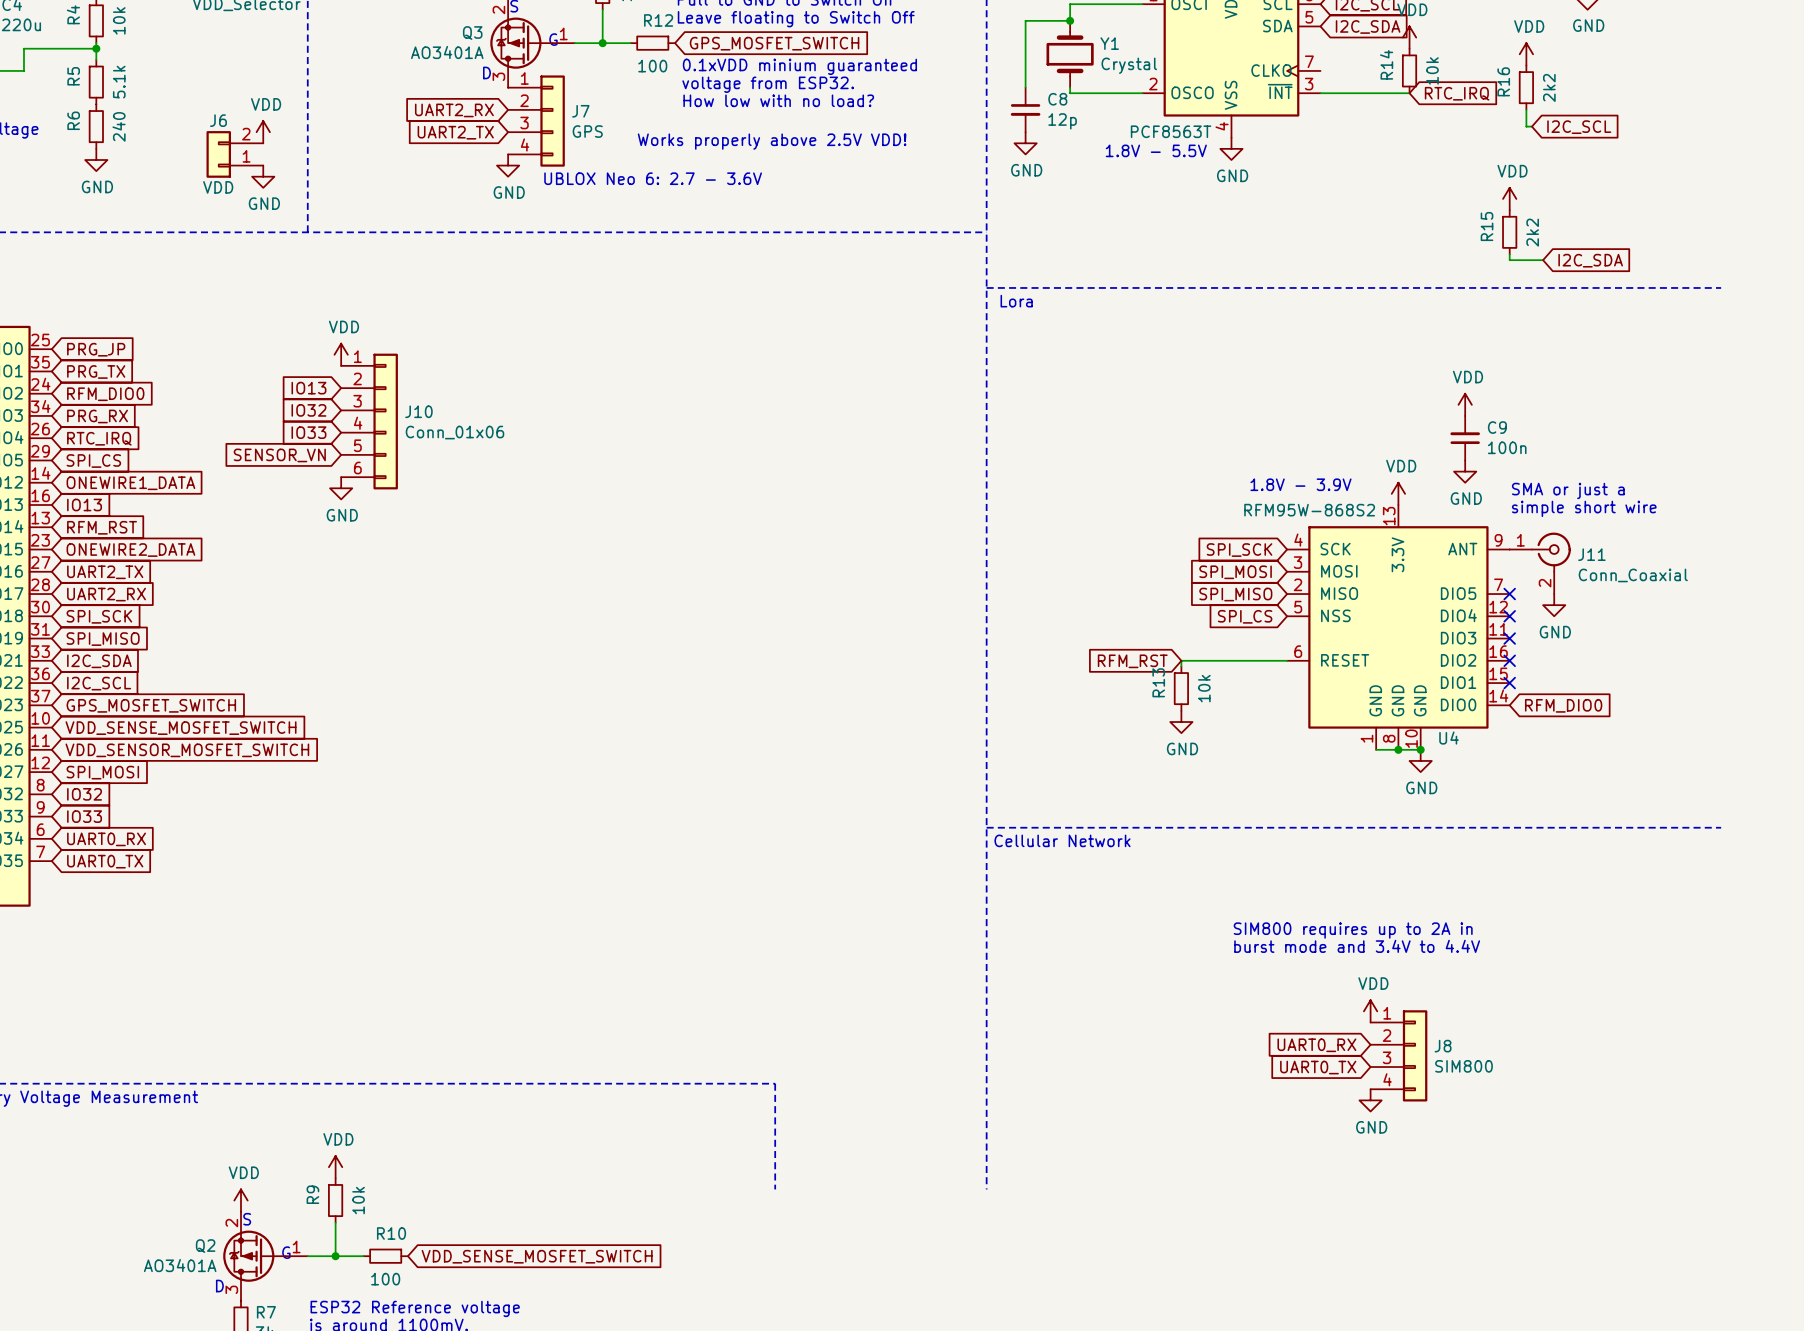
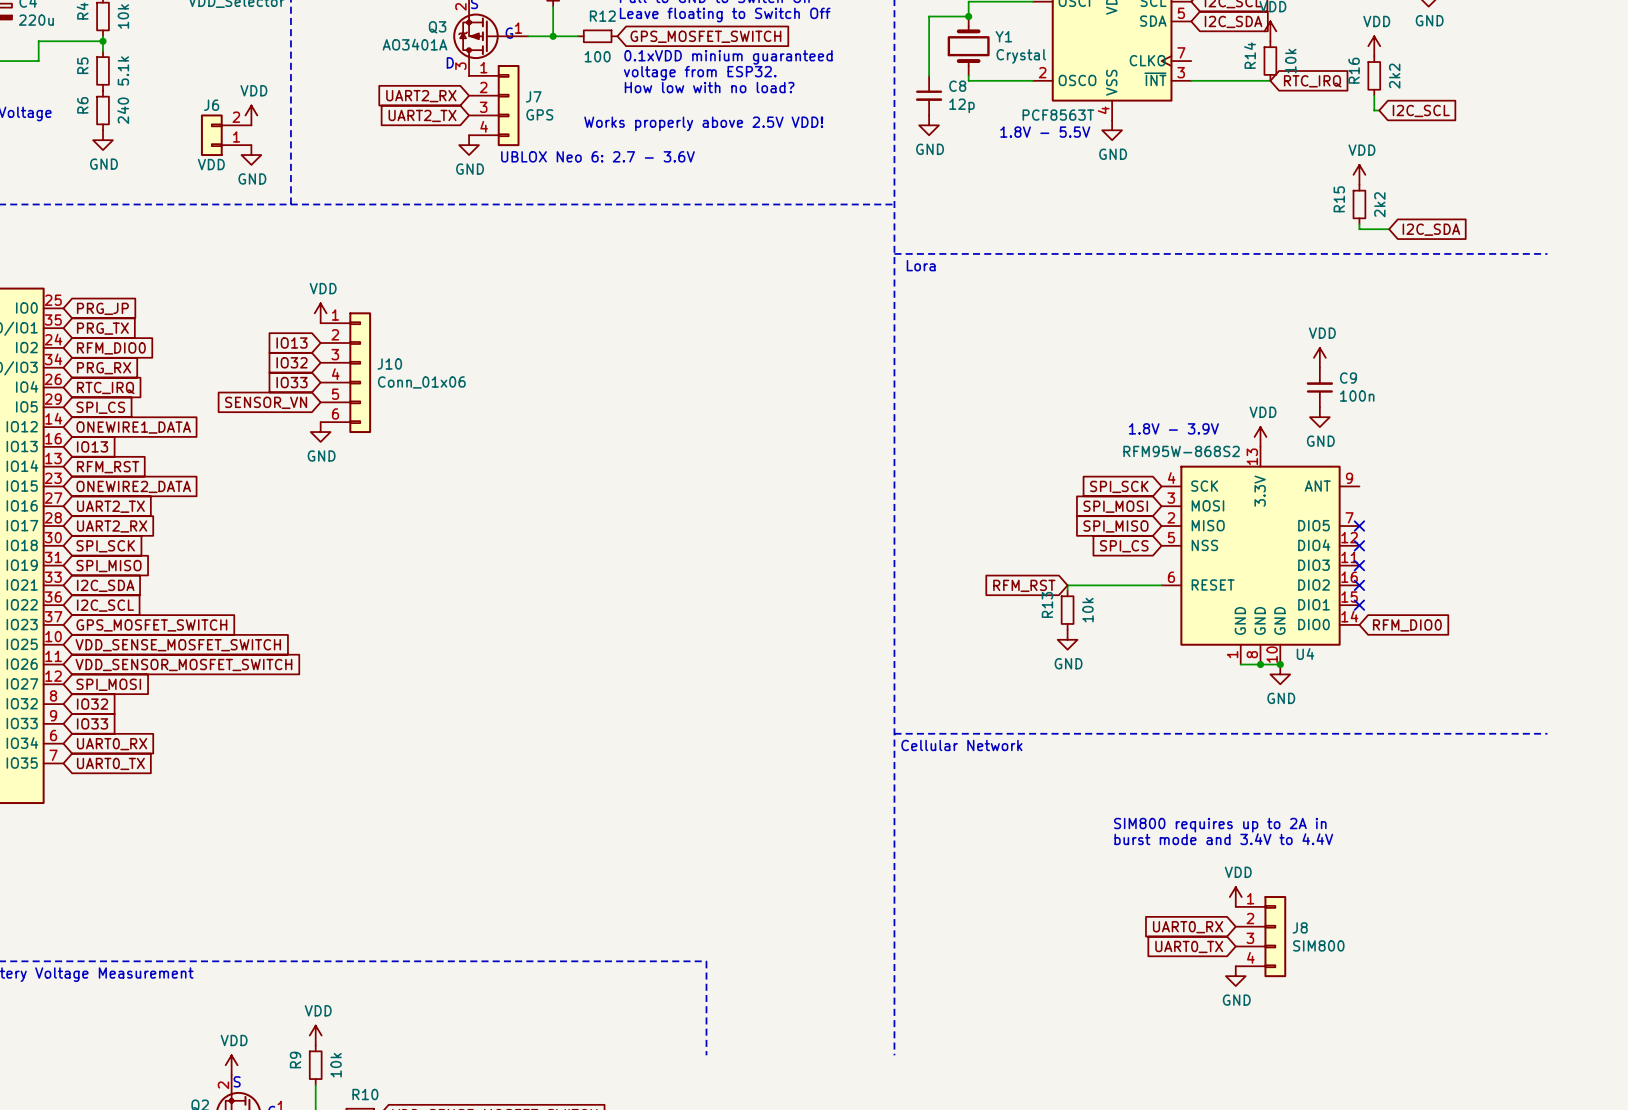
text: SMA or just a (1568, 490) -> none
text: simple short wire (1584, 508) -> none
J11: Conn_Coaxial (1540, 563) -> none
power symbol: GND (1554, 605) -> none

